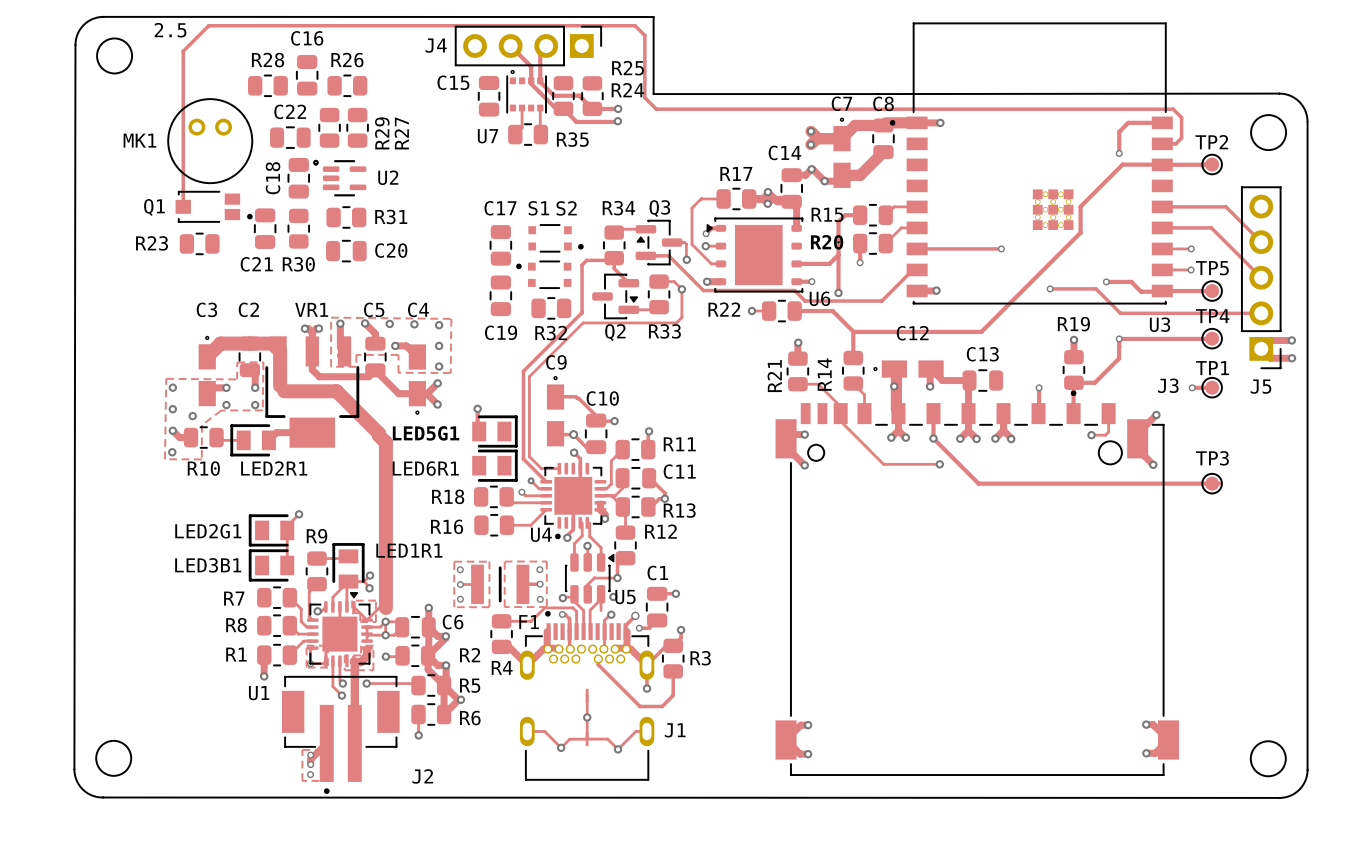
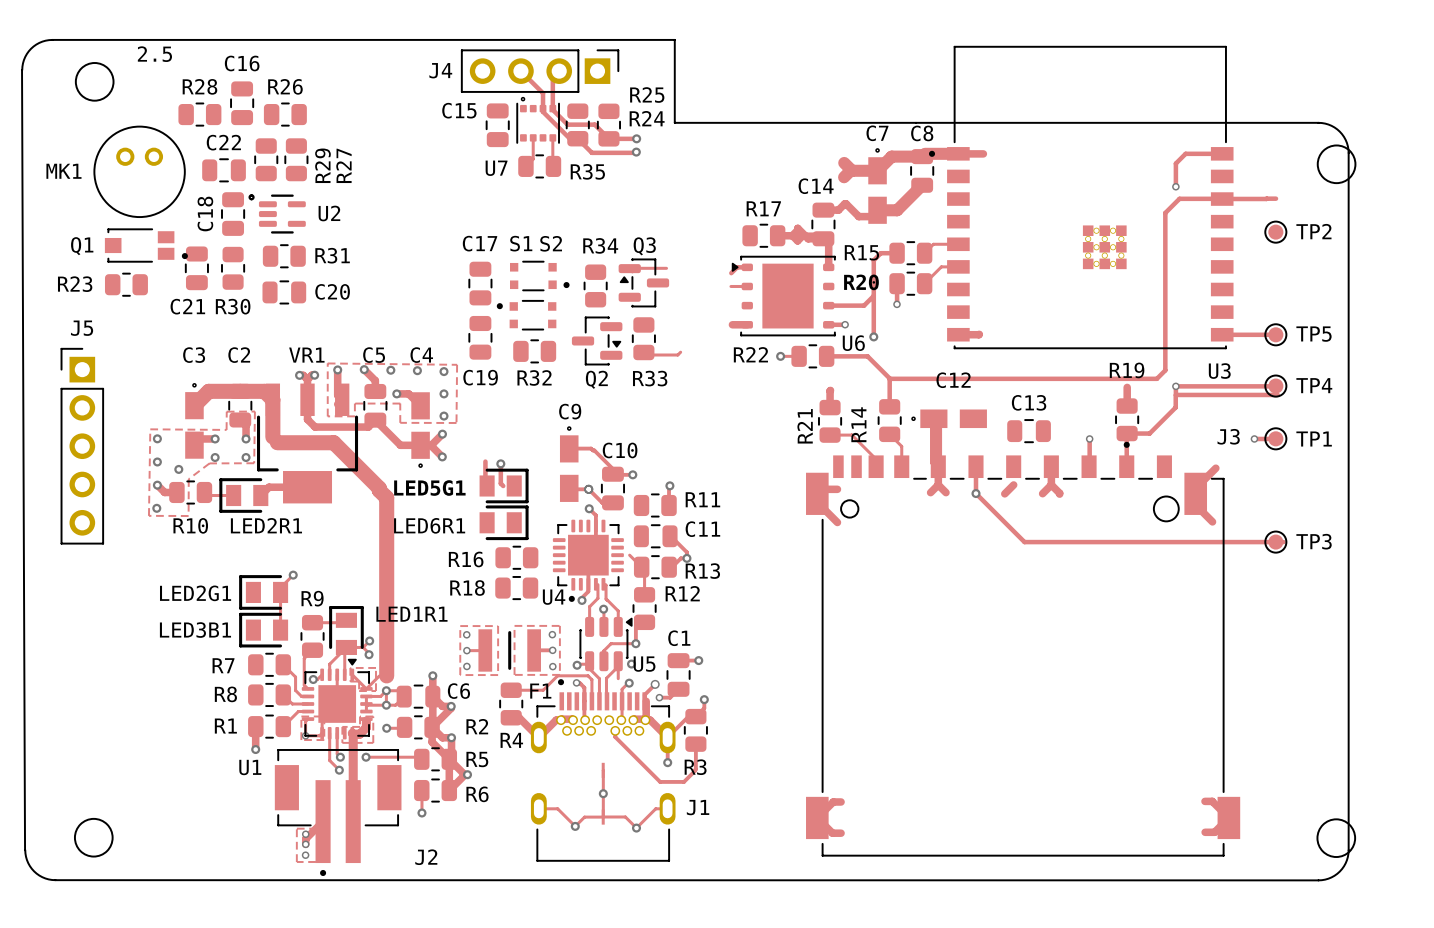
board edge: (103, 16) (653, 17) -> (52, 39) (674, 39)
board edge: (103, 16) (94, 18) (83, 25) (77, 35) (75, 44) (74, 769) (76, 778) (80, 787) (87, 793) (99, 797) (1279, 797) (1294, 793) (1304, 782) (1307, 769) (1307, 122) -> none
board edge: none -> (52, 39) (42, 41) (31, 48) (23, 60) (22, 70)
board edge: none -> (22, 70) (25, 850)
track: (183, 51) (208, 25) (635, 25) (644, 35) (644, 97) (656, 109) (1173, 109) (1181, 117) (1181, 138) (1175, 143) (1162, 143) -> none
track: (183, 51) (183, 206) -> none
C16 position: (307, 75) -> (242, 103)
R28 position: (267, 85) -> (199, 114)
R26 position: (347, 85) -> (285, 114)
board edge: (877, 94) (1282, 93) (1294, 97) (1301, 104) (1305, 112) (1307, 121) -> (915, 122) (1318, 122) (1331, 125) (1344, 136) (1348, 152) (1348, 850) (1345, 863) (1337, 873) (1328, 878) (1318, 880) (55, 880) (45, 878) (34, 871) (28, 863) (25, 850)
via: (940, 122) -> none
R29 position: (329, 127) -> (266, 159)
R27 position: (357, 127) -> (296, 159)
via: (811, 131) -> none
C22 position: (290, 137) -> (224, 170)
MK1 position: (210, 141) -> (139, 171)
TP2 name position: TP2 (1211, 142) -> TP2 (1313, 231)
via: (810, 144) -> none
TP2 position: (1212, 164) -> (1275, 232)
via: (811, 169) -> none
track: (1109, 177) (1080, 206) (1080, 232) (981, 331) -> (1165, 212) (1165, 370) (1156, 378) (1027, 378)
C18 position: (298, 178) -> (233, 214)
U2 position: (339, 178) -> (277, 213)
via: (824, 181) -> none
via: (767, 192) -> none
track: (723, 198) (701, 198) (691, 208) (691, 244) (711, 263) (720, 263) -> none
via: (767, 203) -> none
Q1 position: (214, 206) -> (146, 245)
track: (1162, 206) (1225, 206) (1261, 242) -> none
R31 position: (346, 217) -> (284, 256)
track: (1162, 227) (1211, 227) (1261, 277) -> none
C21 position: (265, 228) -> (196, 268)
R30 position: (298, 228) -> (233, 268)
via: (706, 233) -> none
S1 position: (556, 238) -> (539, 276)
Q3 position: (659, 242) -> (643, 282)
track: (672, 242) (686, 244) (686, 259) -> none
R23 position: (199, 243) -> (126, 284)
C17 position: (500, 245) -> (480, 283)
R34 position: (614, 245) -> (595, 285)
via: (705, 246) -> none
track: (917, 248) (1001, 248) -> none
via: (1001, 248) -> none
track: (1162, 248) (1191, 248) -> none
via: (1191, 248) -> none
C20 position: (346, 251) -> (284, 292)
track: (645, 255) (668, 255) (703, 290) (794, 290) (805, 301) (881, 301) (912, 269) (917, 269) -> none
track: (614, 258) (614, 268) (628, 283) -> none
via: (686, 259) -> none
track: (607, 260) (586, 260) (582, 265) (582, 312) (523, 371) (523, 459) (546, 481) -> none
TP5 name position: TP5 (1212, 268) -> TP5 (1313, 334)
track: (1162, 269) (1191, 269) -> none
via: (1191, 270) -> none
S2 position: (543, 274) -> (526, 315)
J5 rotation: 0° (1261, 277) -> 180° (82, 446)
J5 position: (1261, 277) -> (82, 446)
track: (659, 281) (674, 281) (681, 289) (681, 317) (676, 322) (583, 322) (529, 376) (529, 456) (541, 468) (559, 468) -> none
via: (707, 281) -> none
track: (1106, 281) (1131, 281) (1141, 291) (1162, 290) -> none
via: (1106, 281) -> none
track: (1050, 288) (1096, 288) (1120, 313) -> none
via: (1050, 288) -> none
via: (681, 289) -> none
via: (936, 290) -> none
R33 position: (659, 294) -> (643, 338)
C19 position: (500, 295) -> (480, 337)
Q2 position: (615, 296) -> (597, 340)
R32 position: (551, 308) -> (534, 351)
track: (1120, 313) (1261, 313) -> none
TP4 name position: TP4 (1212, 316) -> TP4 (1314, 385)
via: (1074, 339) -> none
track: (1291, 340) (1269, 340) (1261, 348) (1270, 358) (1291, 358) -> none
via: (1291, 340) -> none
via: (798, 342) -> none
track: none -> (1178, 394) (1277, 394)
via: (1291, 358) -> none
TP1 name position: TP1 (1212, 368) -> TP1 (1314, 439)
via: (894, 386) -> none
track: (930, 386) (931, 369) (942, 380) (969, 380) (968, 430) (976, 438) -> none
via: (930, 386) -> none
via position: (477, 408) -> (500, 463)
track: none -> (500, 463) (500, 483) (503, 486)
track: (840, 413) (840, 421) (866, 447) -> none
track: (1108, 413) (1108, 432) (1105, 435) (1091, 435) -> none
via: (1156, 415) -> none
via: (804, 434) -> none
via: (1091, 435) -> none
via: (891, 437) -> none
via: (905, 437) -> none
via: (960, 438) -> none
via: (976, 438) -> none
via: (995, 438) -> none
via: (1011, 439) -> none
track: (866, 447) (883, 464) (939, 464) -> none
track: (622, 449) (611, 460) (611, 484) (606, 488) (600, 488) -> none
TP3 name position: TP3 (1212, 458) -> TP3 (1314, 541)
via: (939, 464) -> none
via: (1153, 464) -> none
via: (804, 465) -> none
track: (622, 478) (622, 488) (615, 495) (600, 495) -> none
track: (531, 480) (539, 488) (546, 488) -> none
via: (531, 480) -> none
track: (521, 492) (525, 495) (546, 495) -> none
via: (521, 492) -> none
R18 position: (493, 496) -> (516, 588)
track: (506, 496) (512, 502) (546, 502) -> none
track: (600, 503) (600, 509) (604, 514) (604, 518) -> none
track: (546, 509) (530, 525) (506, 525) -> none
via: (604, 518) -> none
R16 position: (494, 525) -> (516, 557)
track: (547, 631) (547, 649) -> none
R3 name position: R3 (700, 658) -> R3 (695, 767)
via: (1146, 724) -> none
via: (808, 725) -> none
via: (1146, 753) -> none
via: (808, 754) -> none

